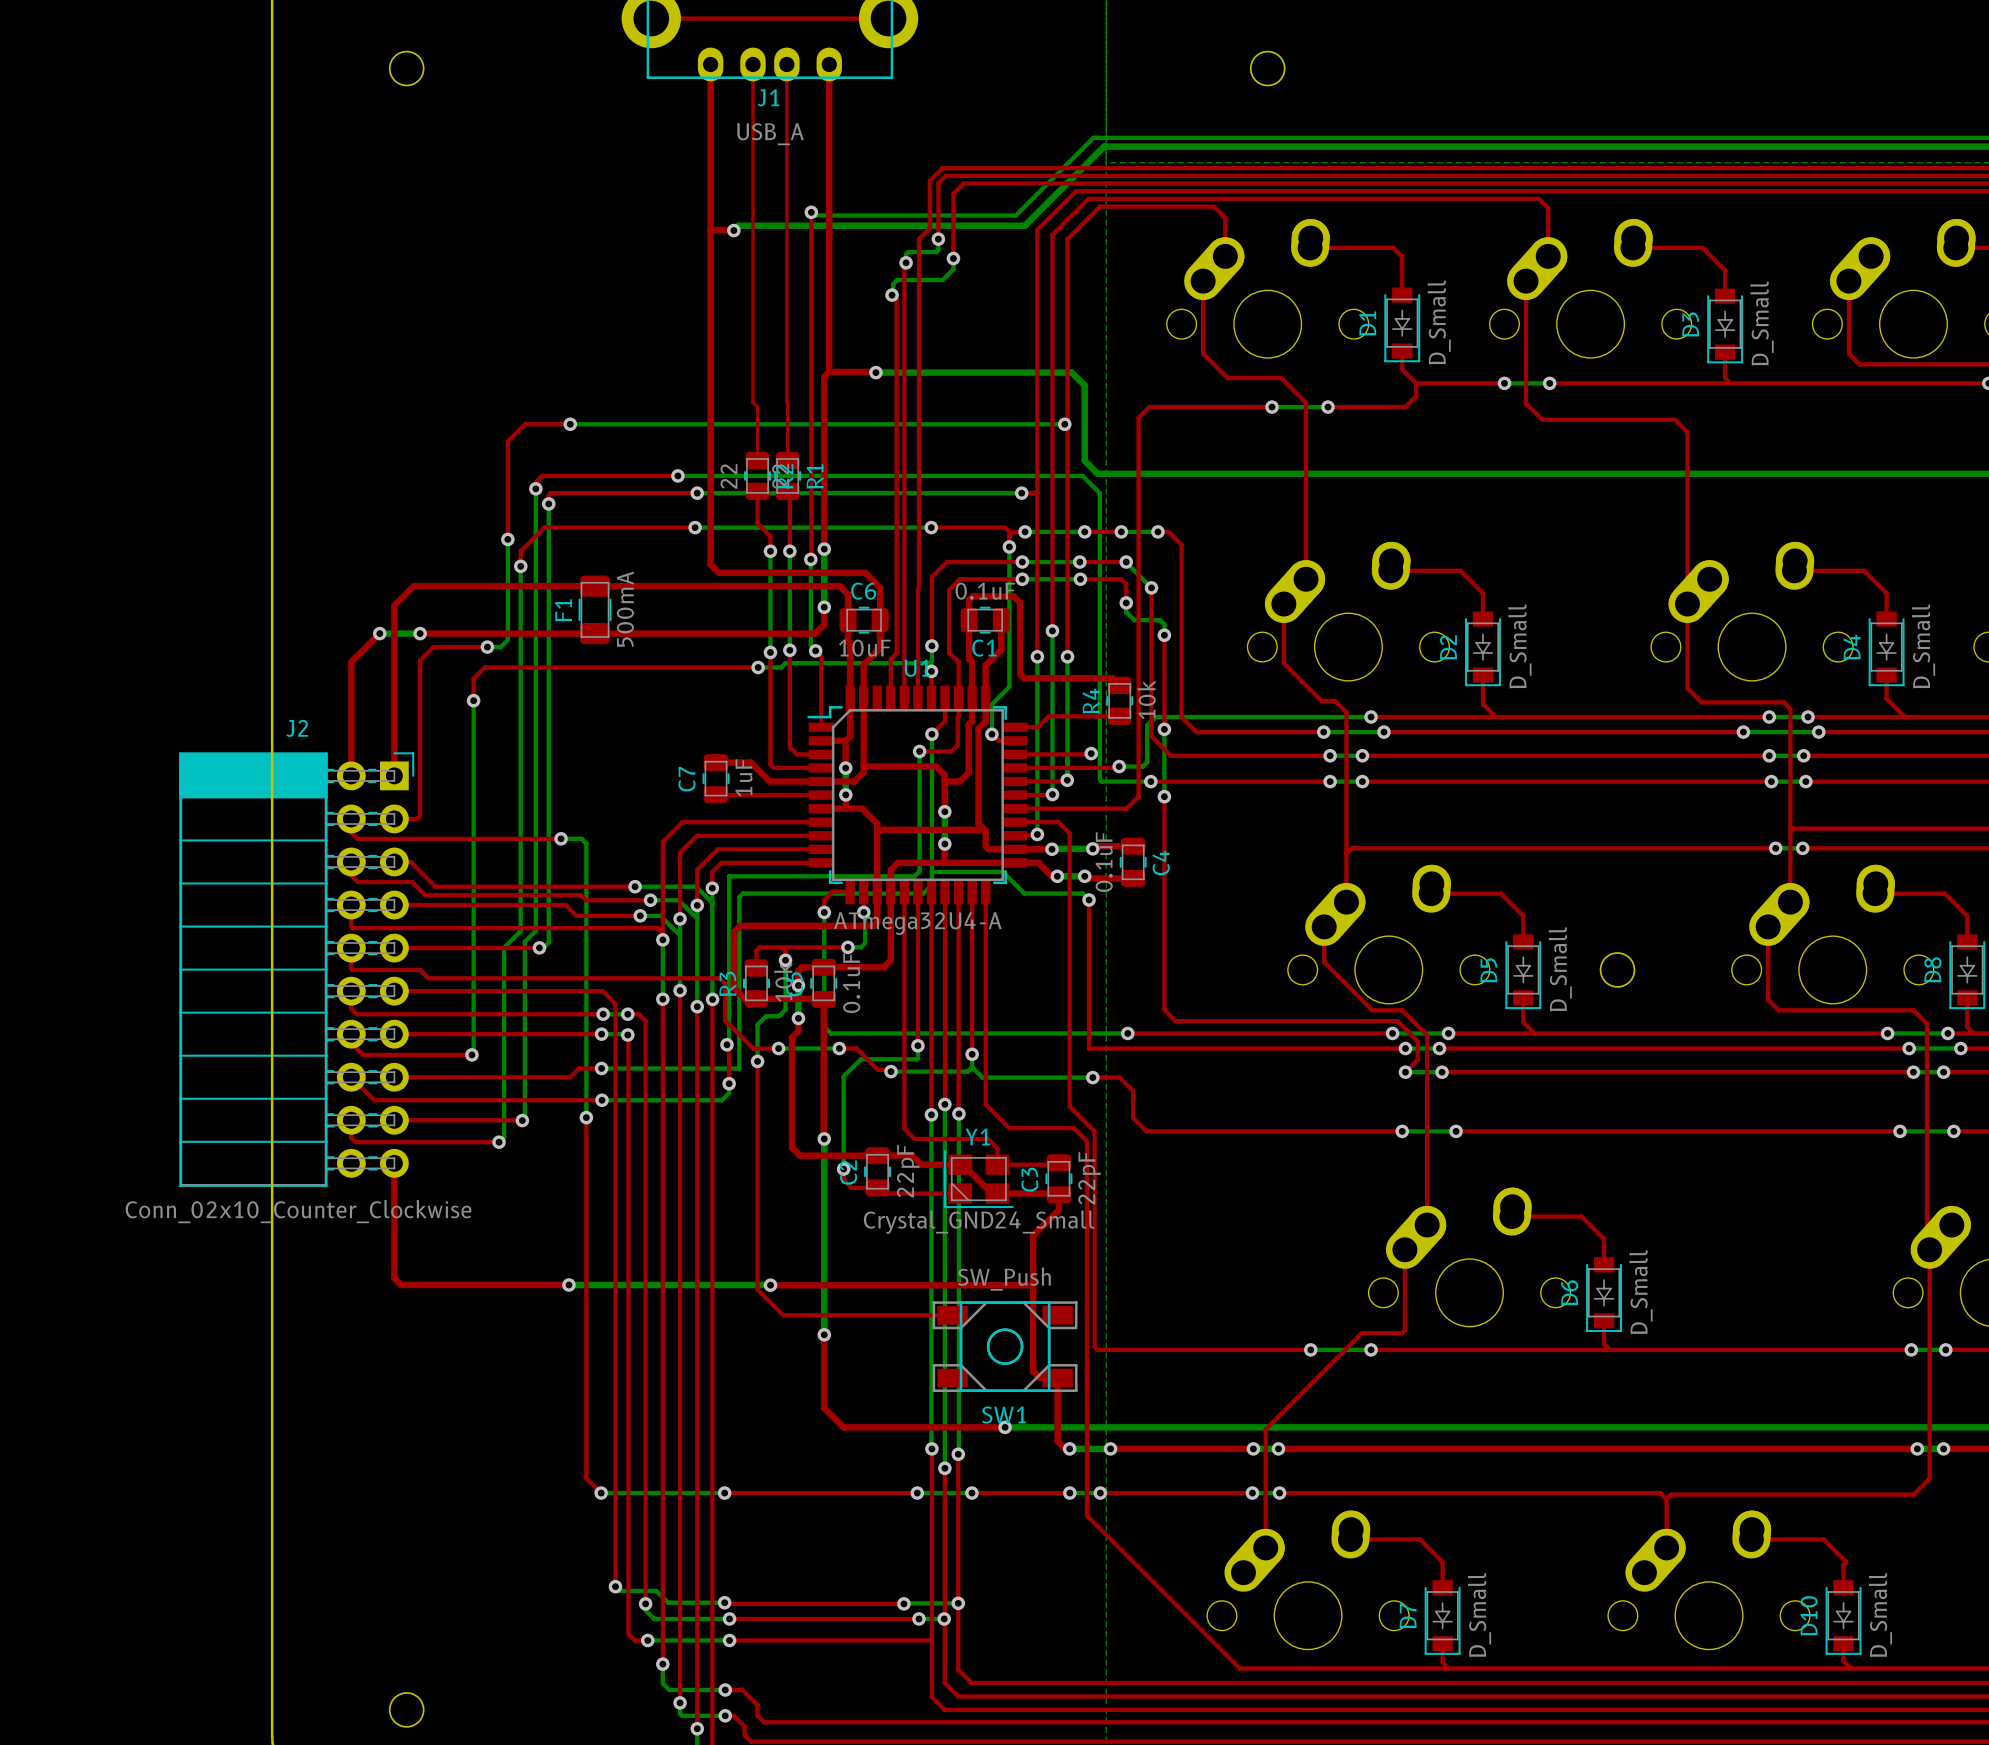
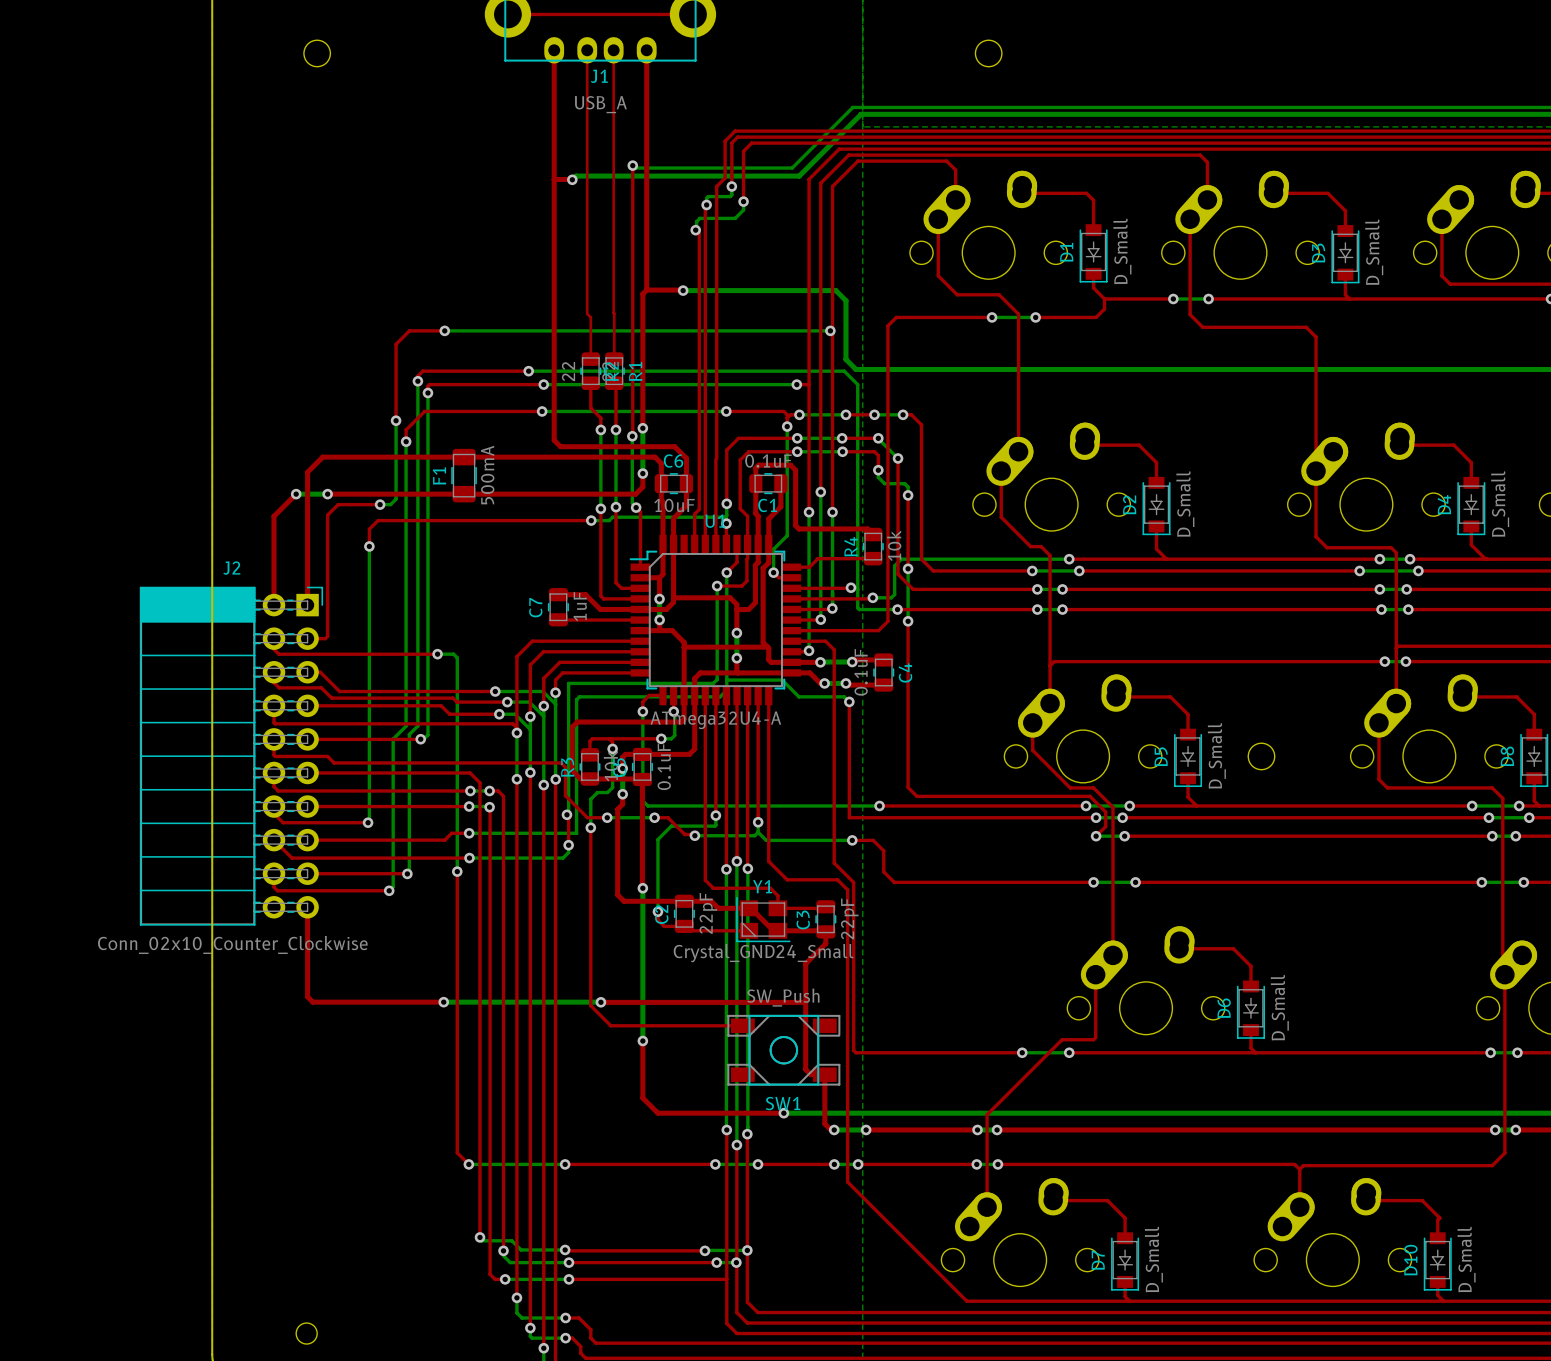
round board edge size: [388, 1692, 425, 1728] -> [295, 1322, 318, 1345]

